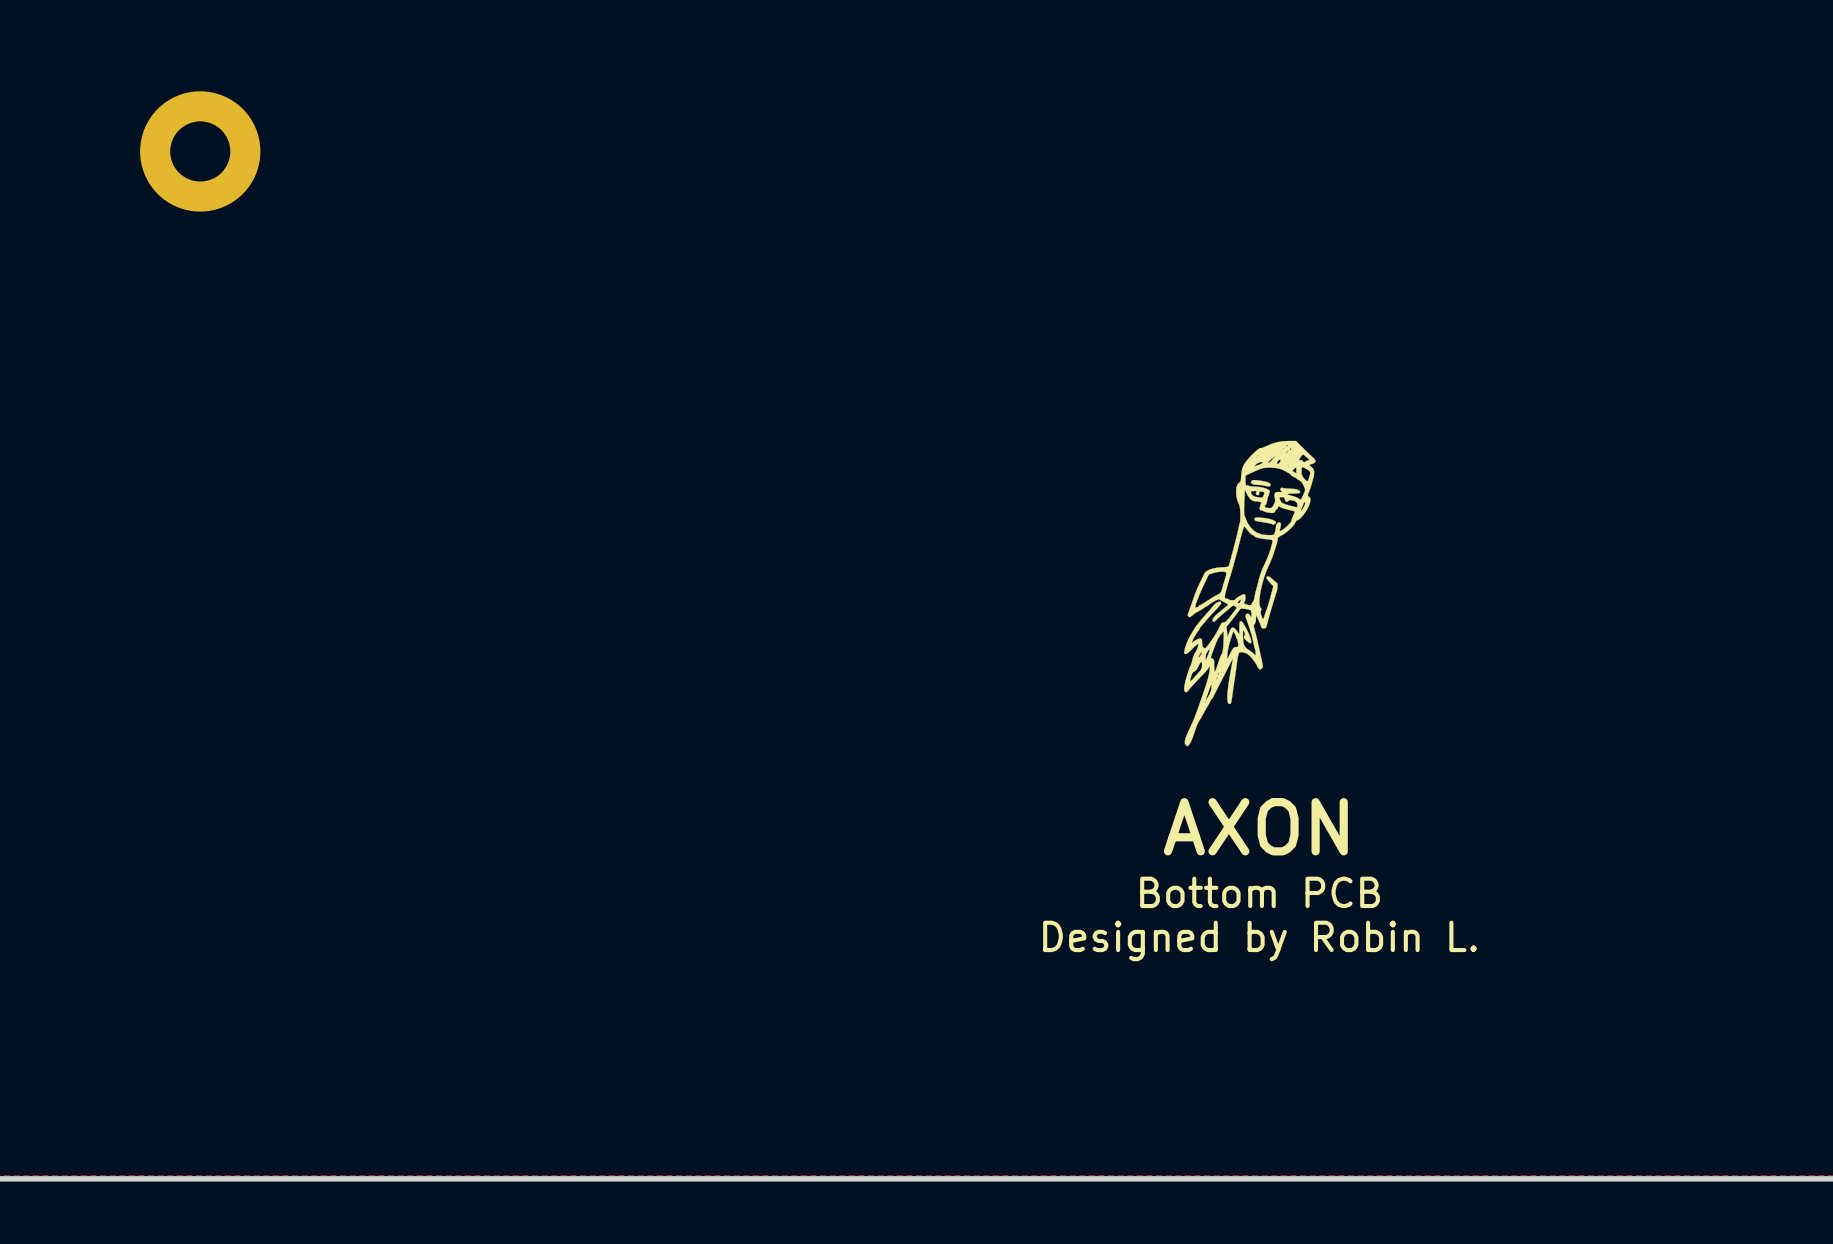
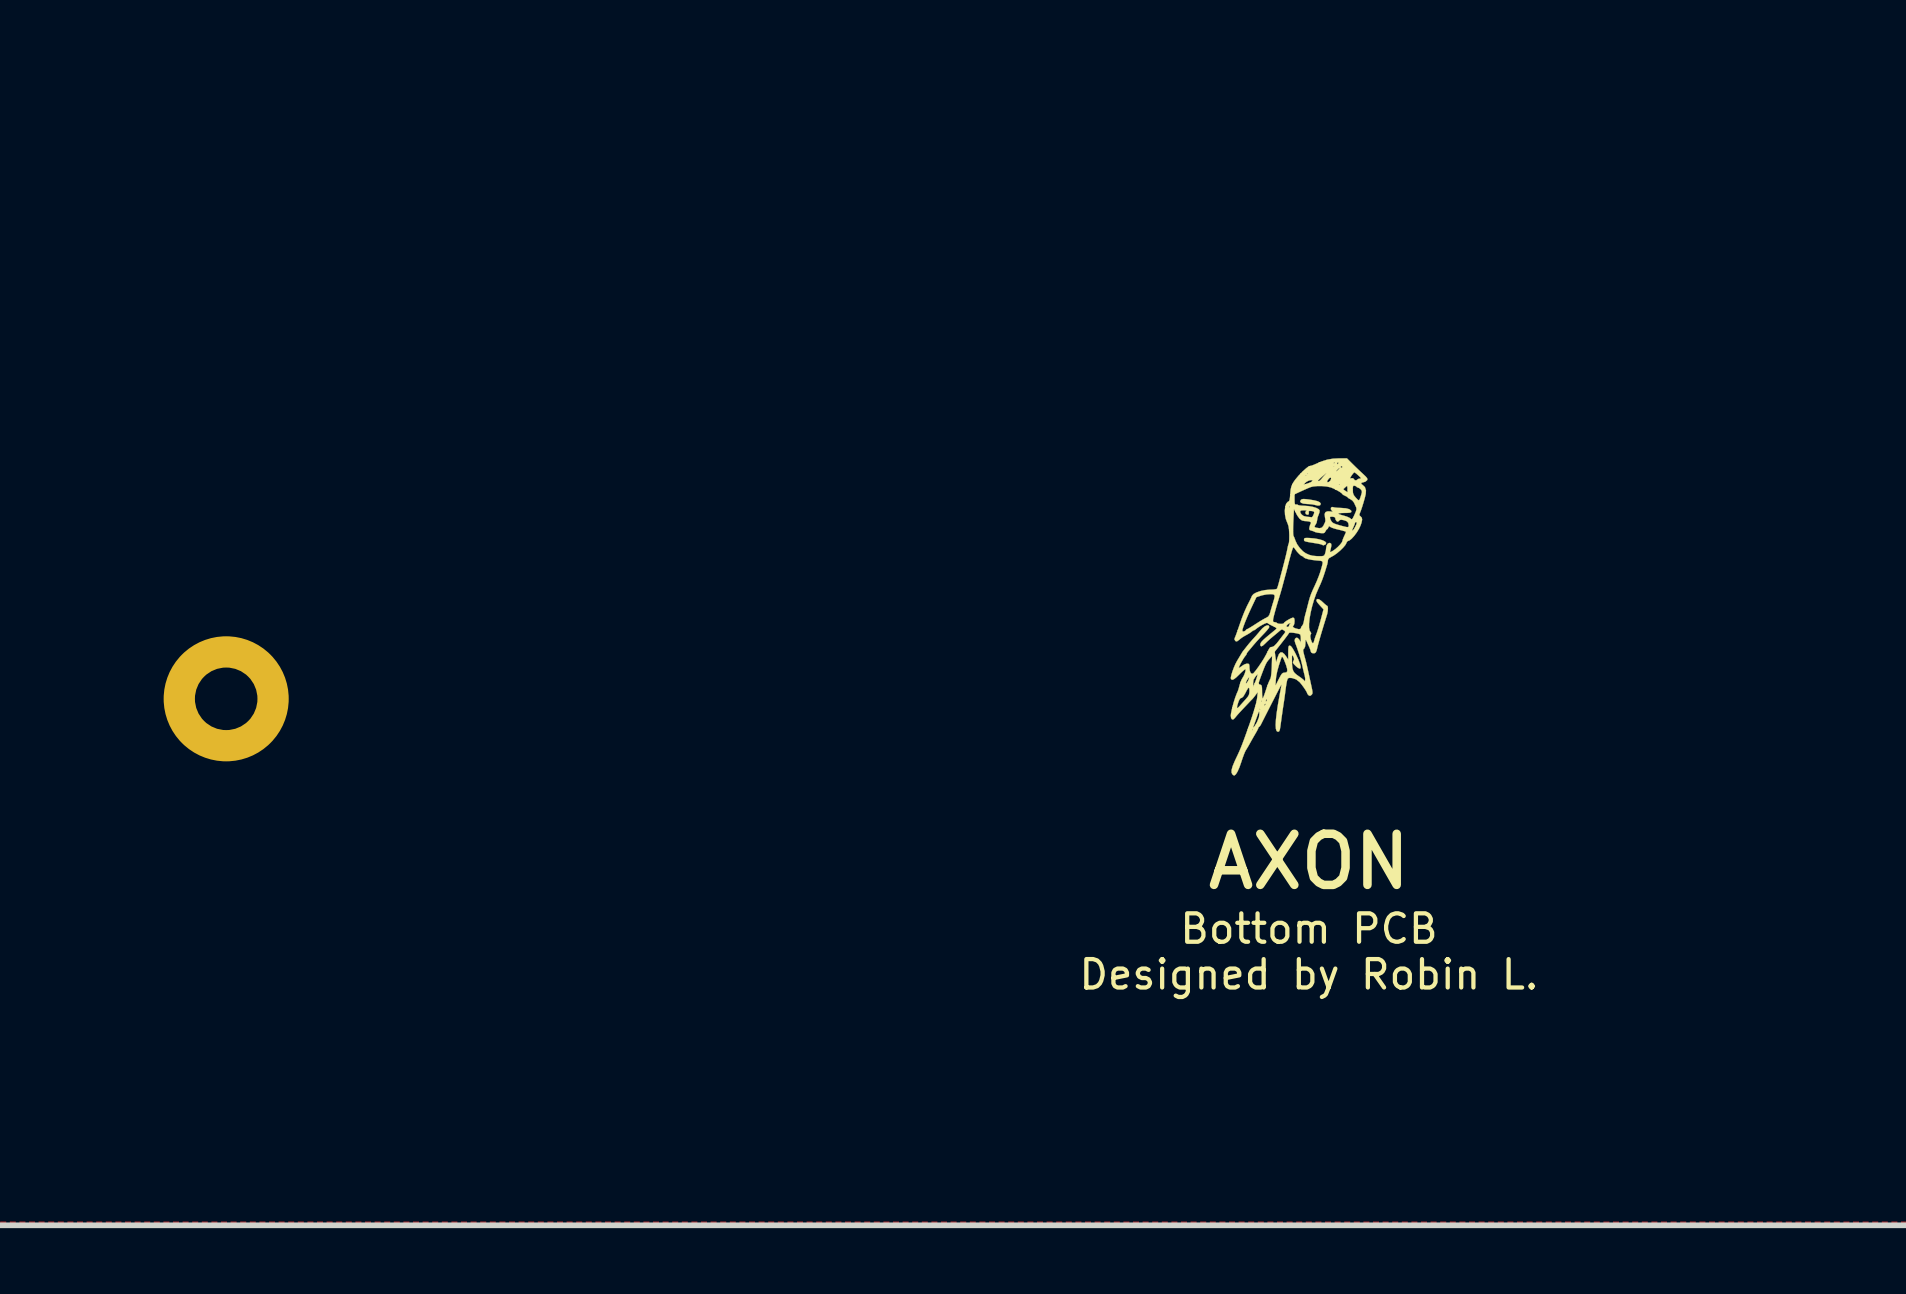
part position: (200, 151) -> (226, 698)

